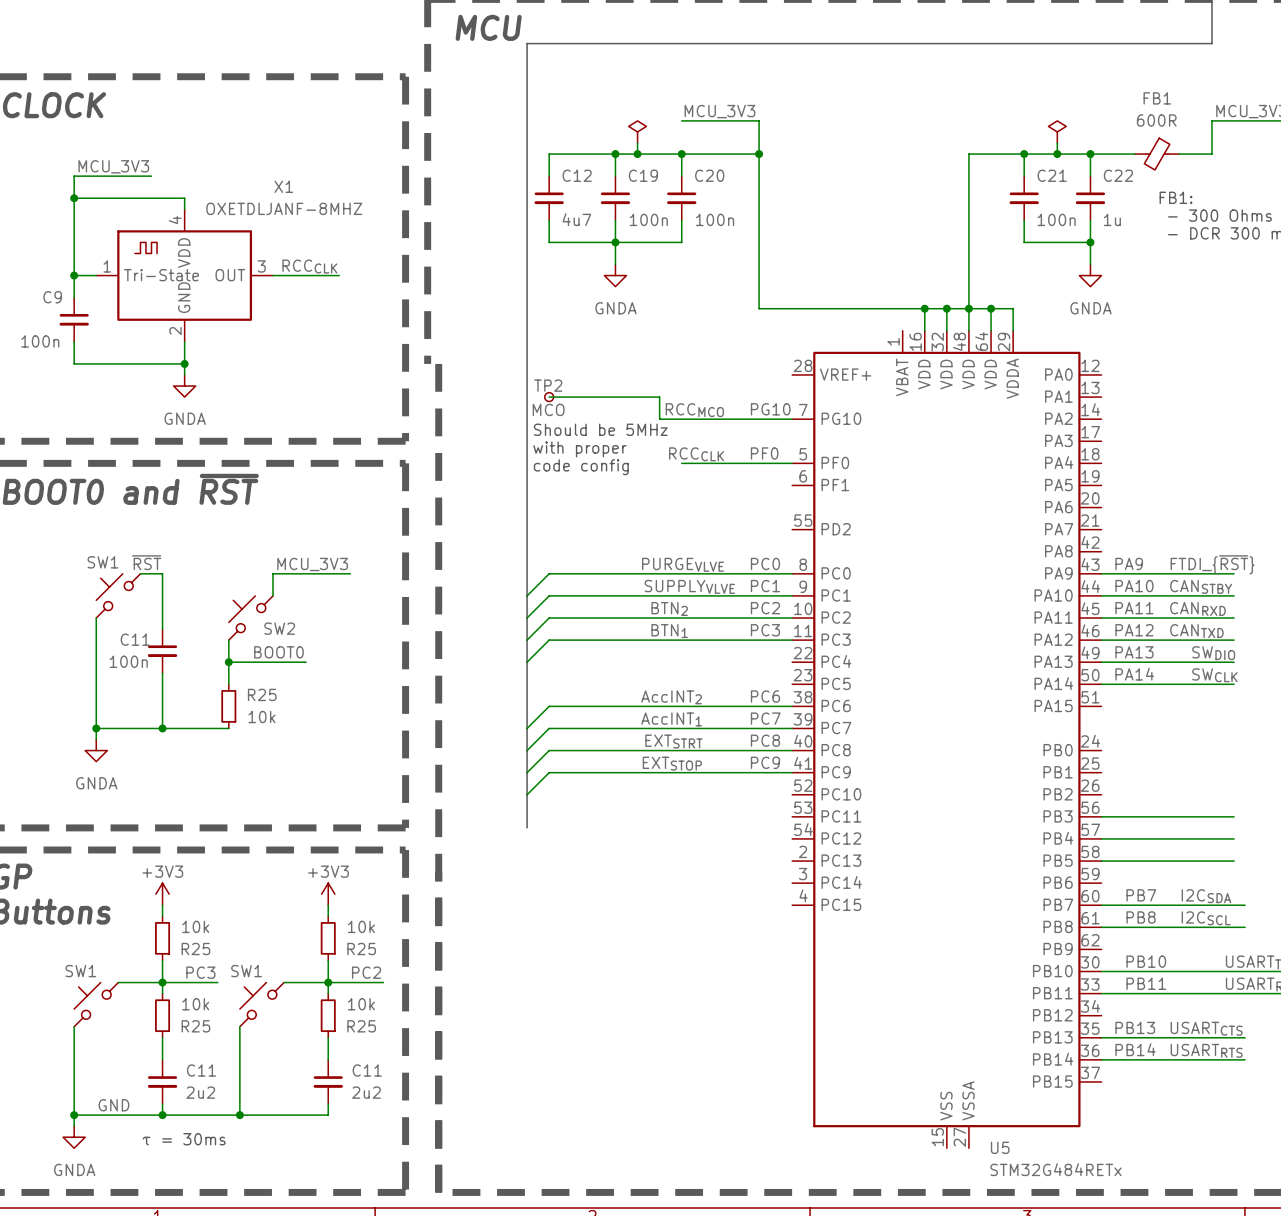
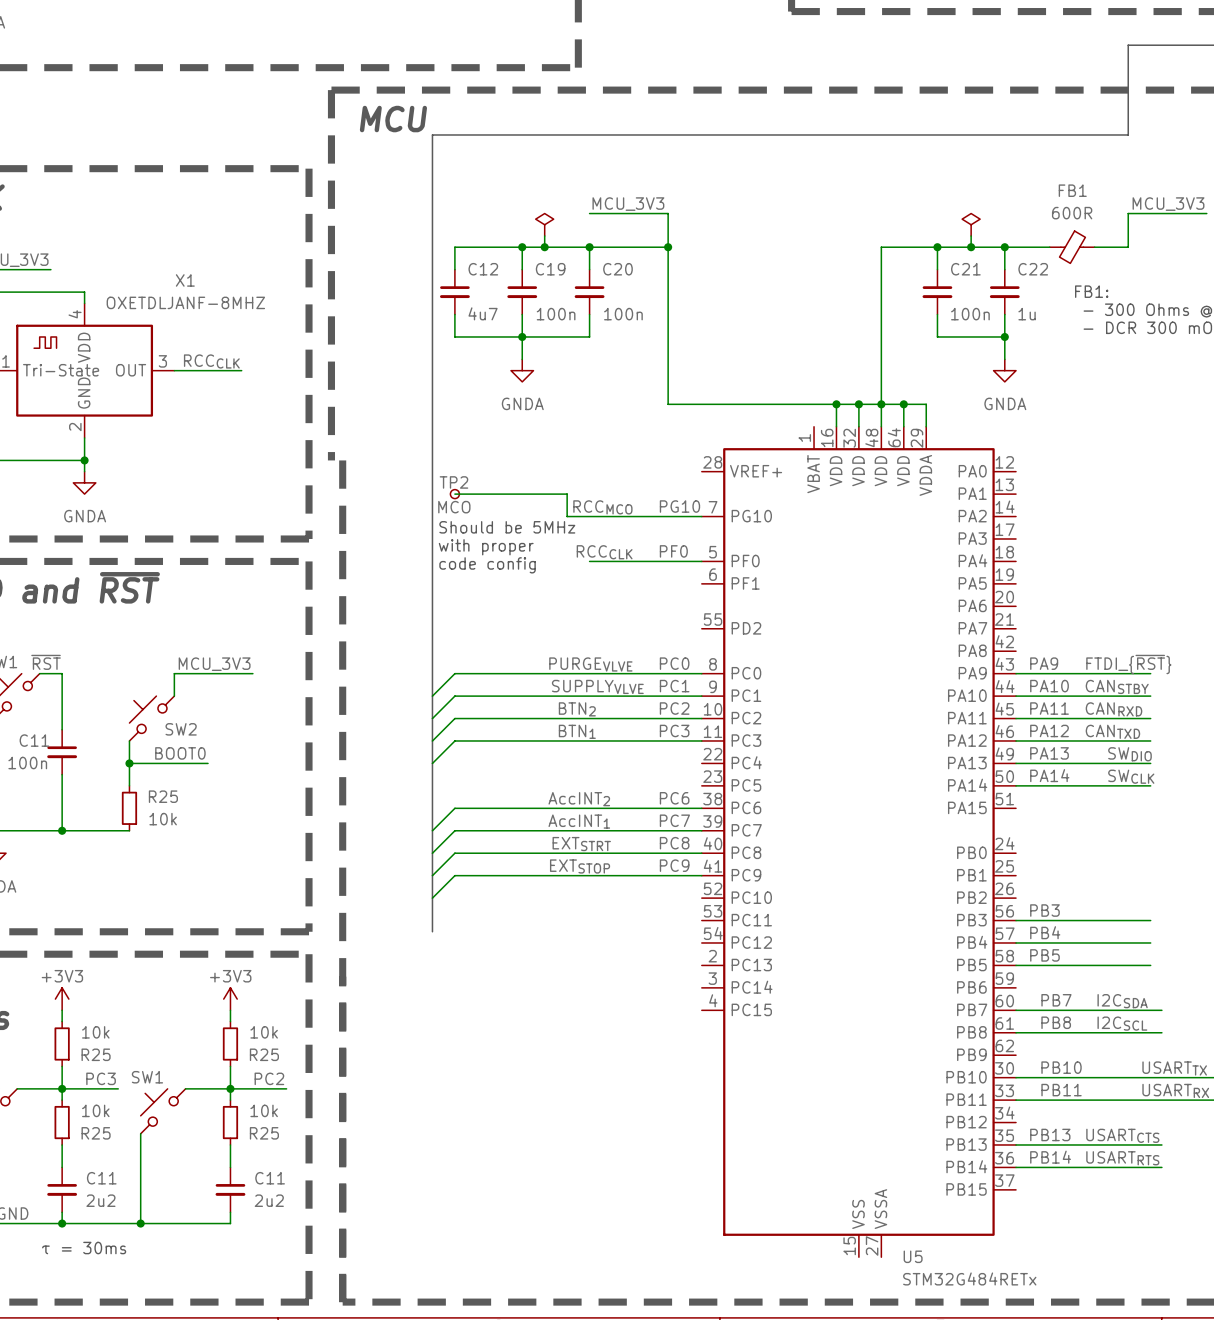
label: none -> PB3 (1044, 910)
label: none -> PB4 (1045, 932)
label: none -> PB5 (1044, 955)

